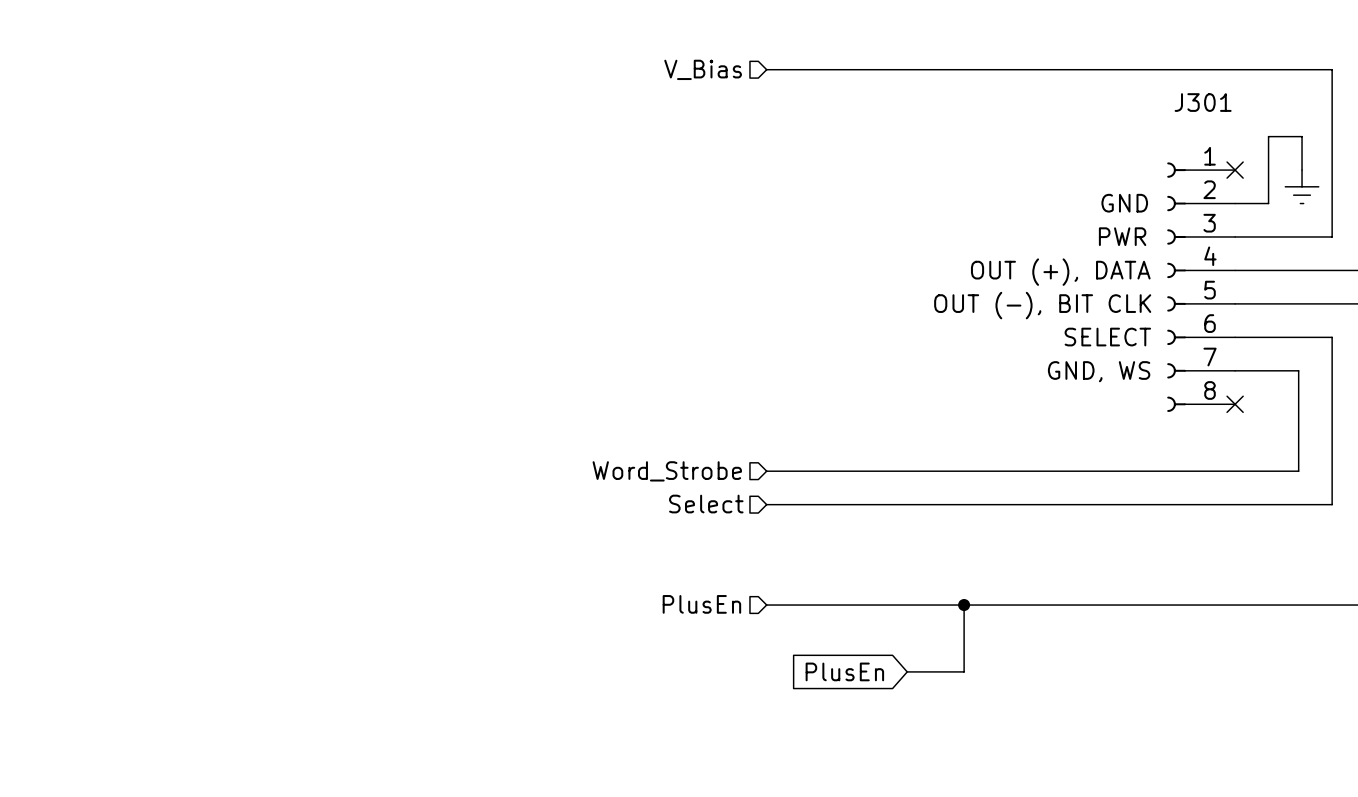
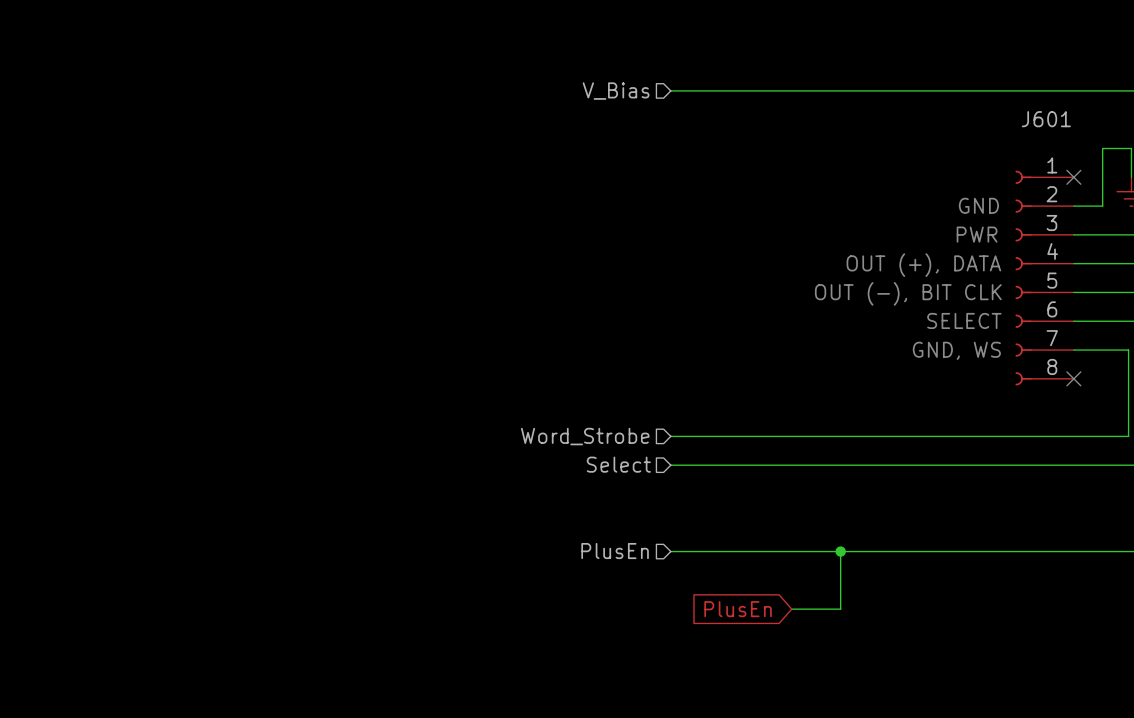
J301 name: J301 (1203, 102) -> J601 (1046, 119)

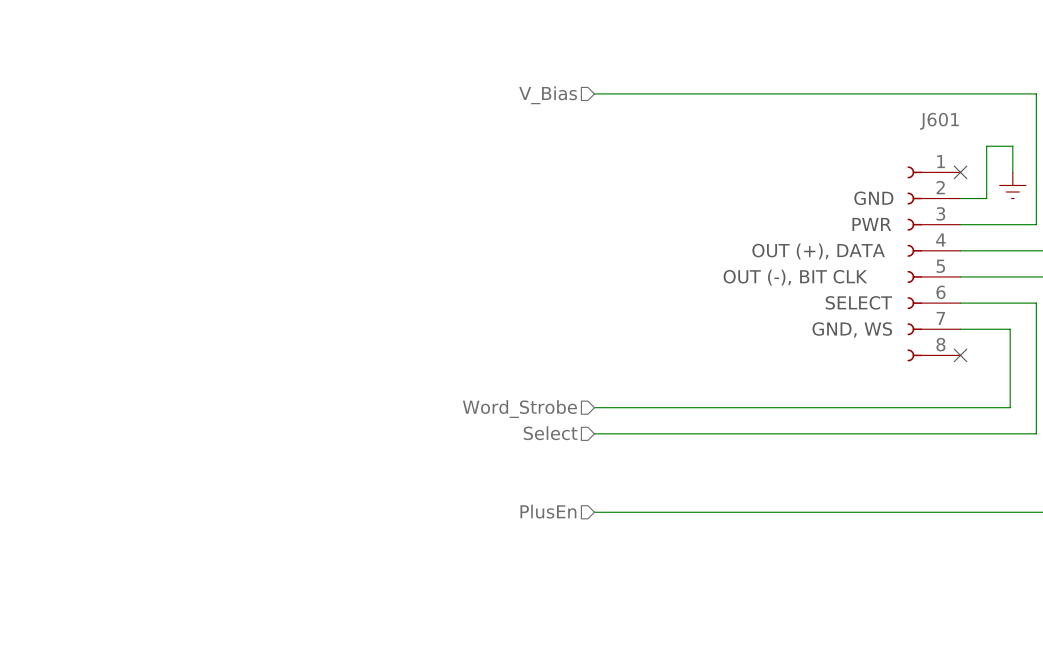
wire: (840, 551) (840, 609) (791, 609) -> none
junction: (840, 551) -> none
global label: PlusEn (738, 609) -> none

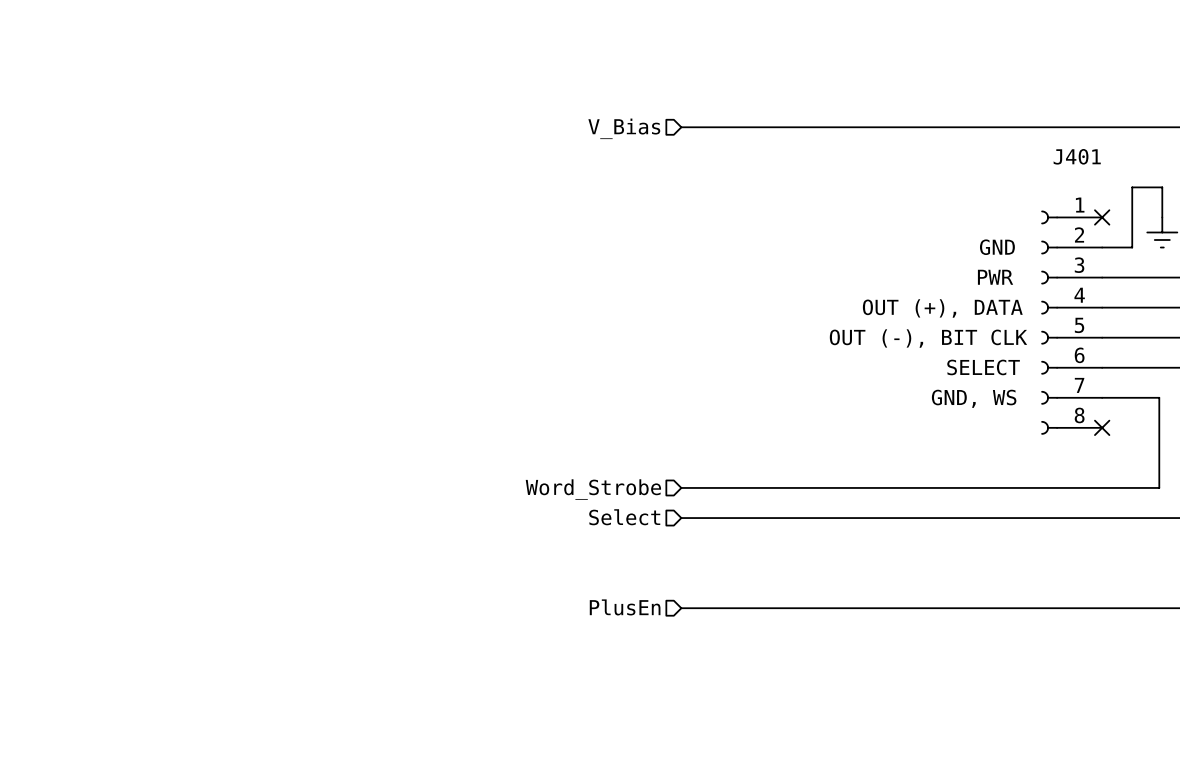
J601 name: J601 (939, 121) -> J401 (1077, 156)

